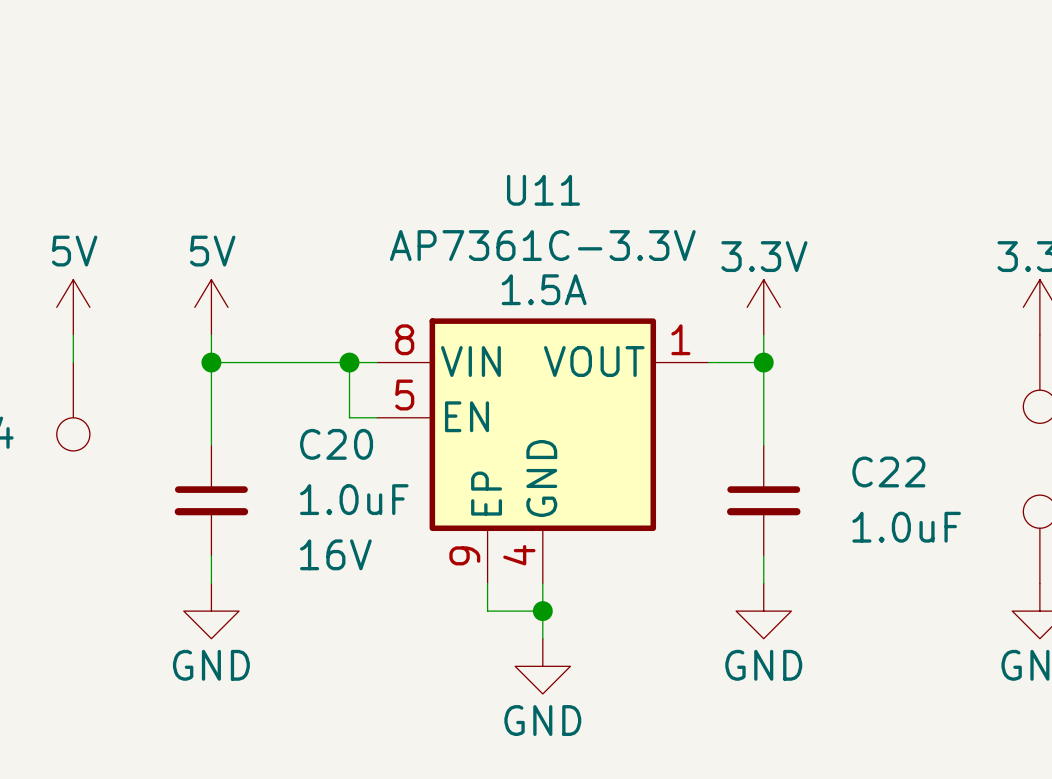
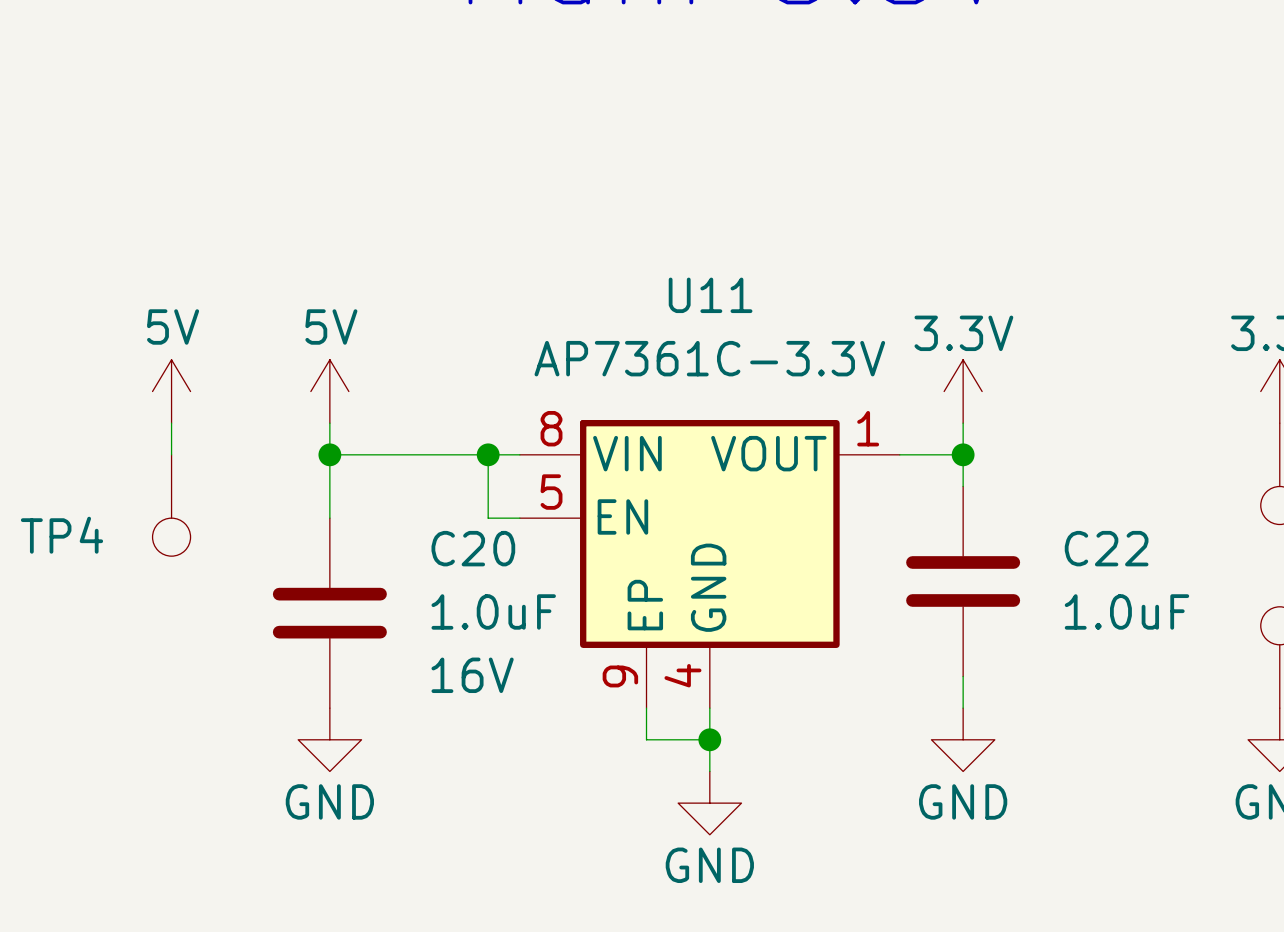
U11 name position: U11 (543, 190) -> U11 (710, 295)
U11 value position: AP7361C-3.3V (542, 245) -> AP7361C-3.3V (709, 358)
U11 text: 1.5A (544, 289) -> none
U11 symbol: [377, 318, 709, 584] -> [519, 420, 900, 709]
C20 symbol: [174, 445, 249, 556] -> [272, 518, 387, 709]
C22 symbol: [727, 445, 801, 556] -> [906, 486, 1021, 677]

